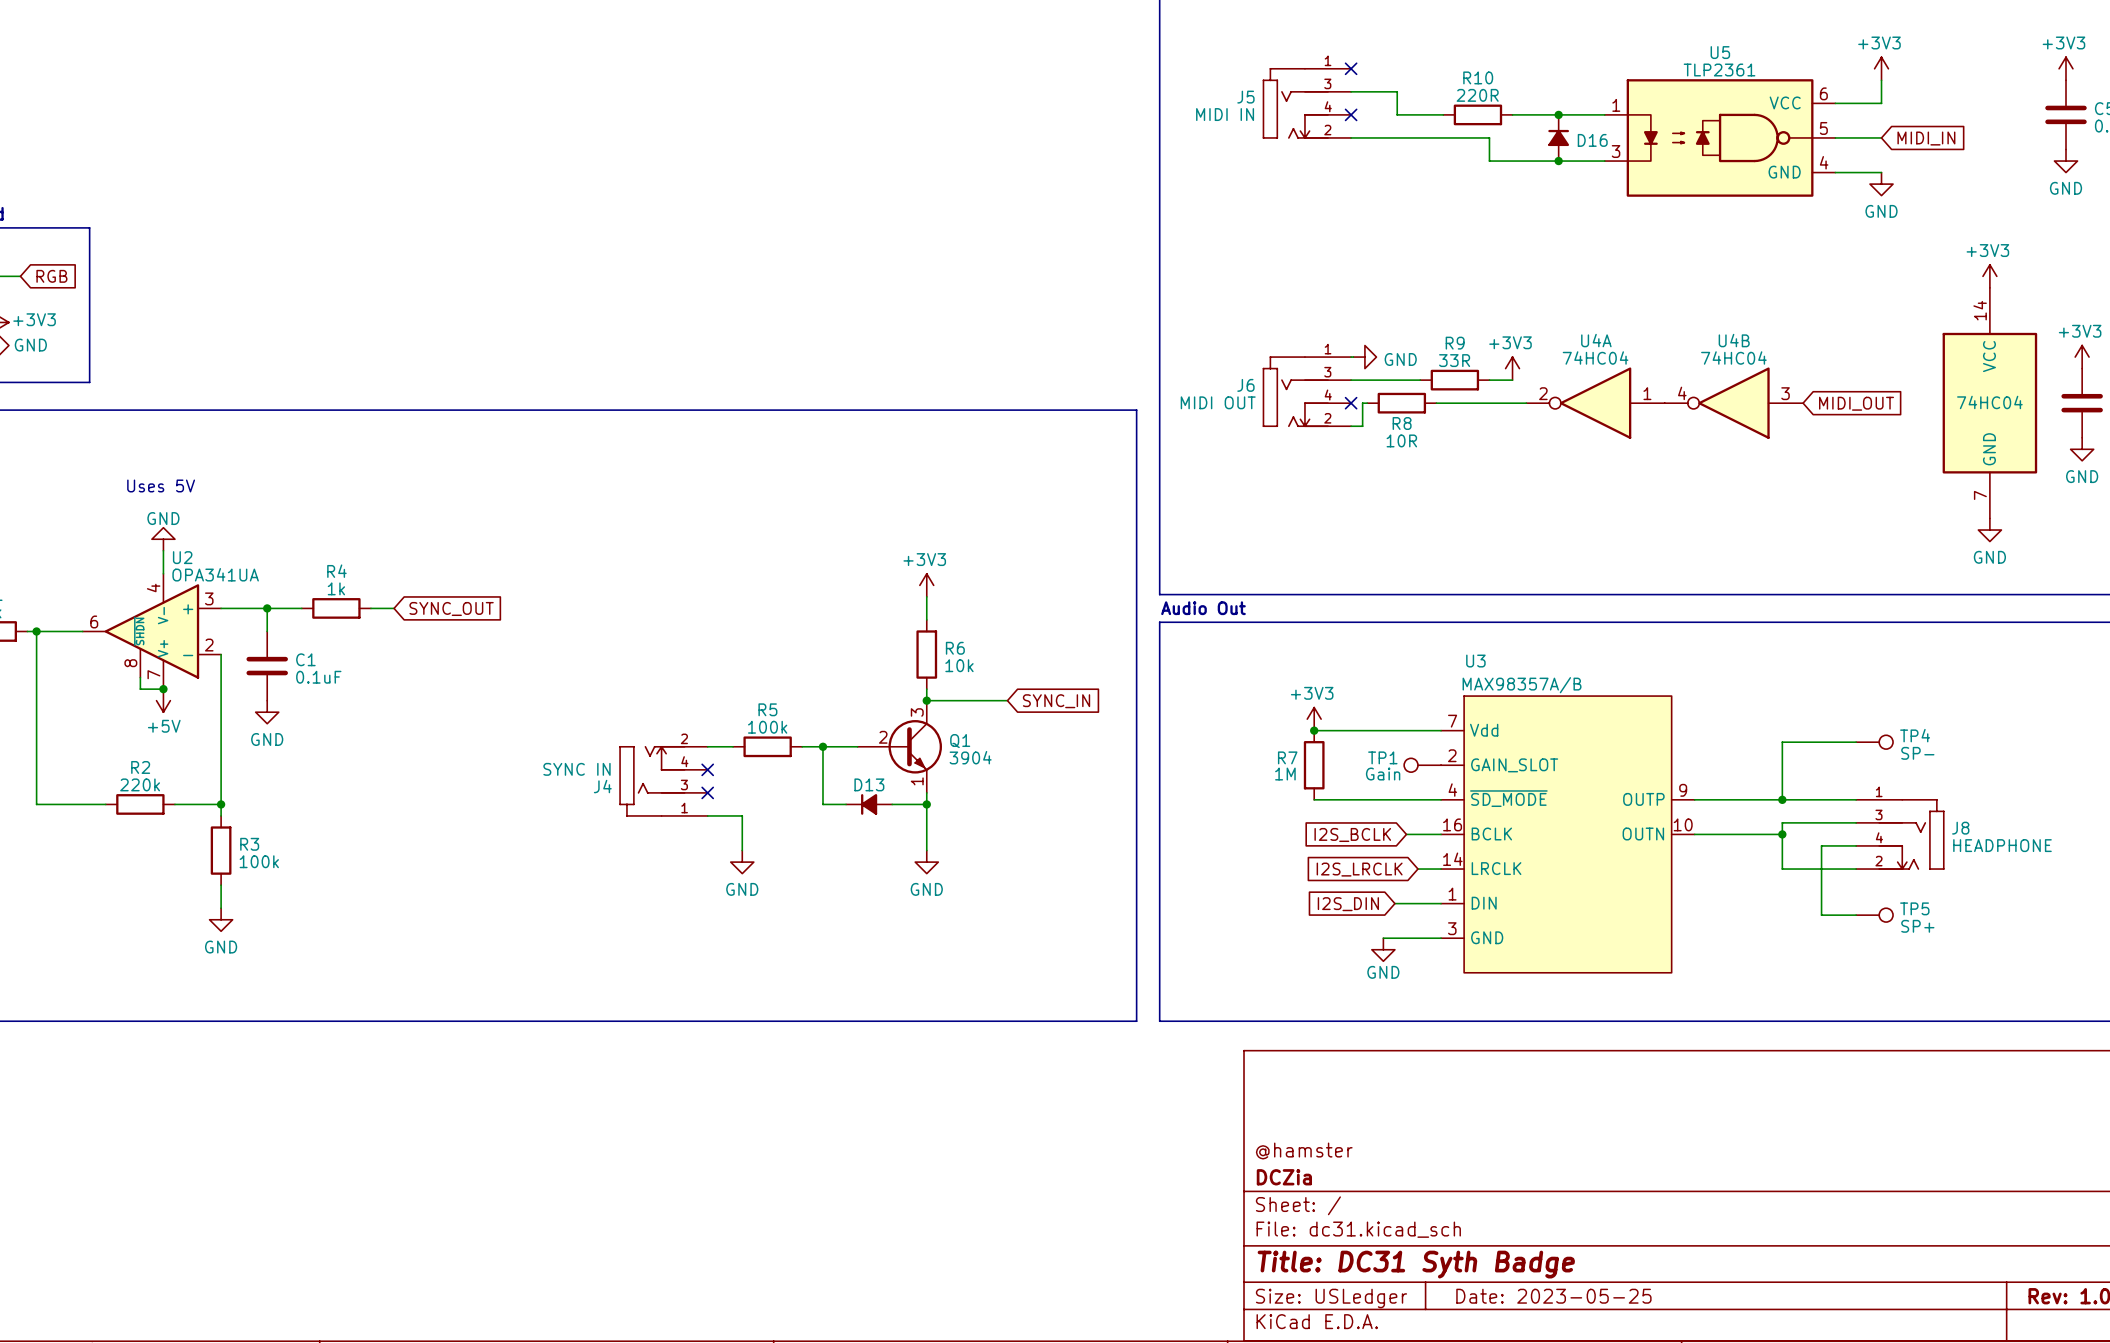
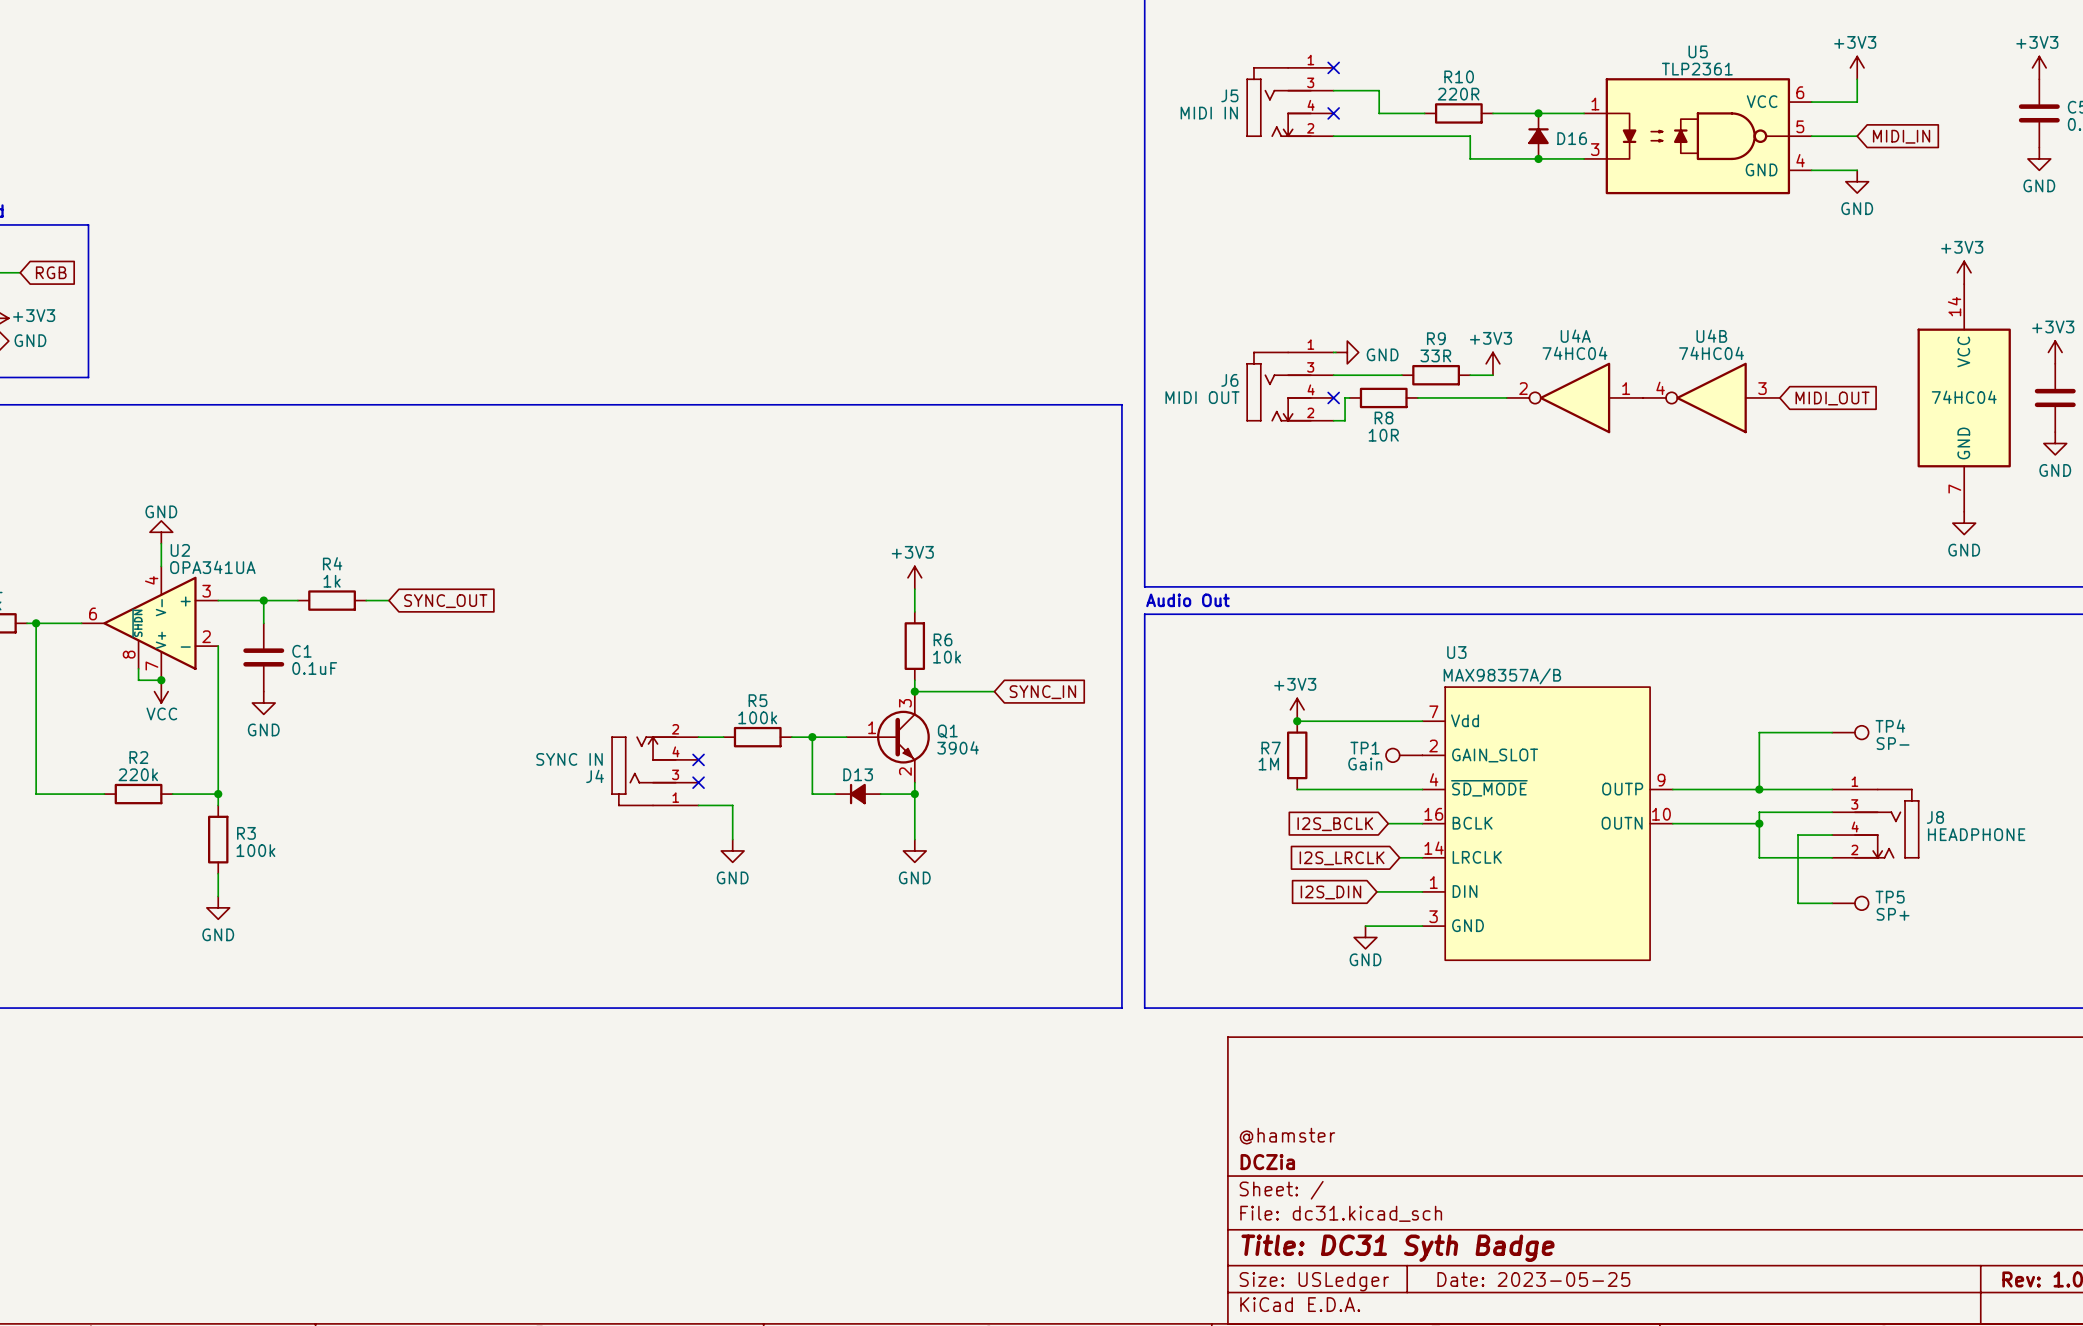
text: Uses 5V (161, 485) -> none
power symbol: +5V (163, 700) -> VCC (161, 691)
Q1 pin number: 2 (883, 737) -> 1 (872, 727)
Q1 pin number: 1 (917, 781) -> 2 (905, 771)

